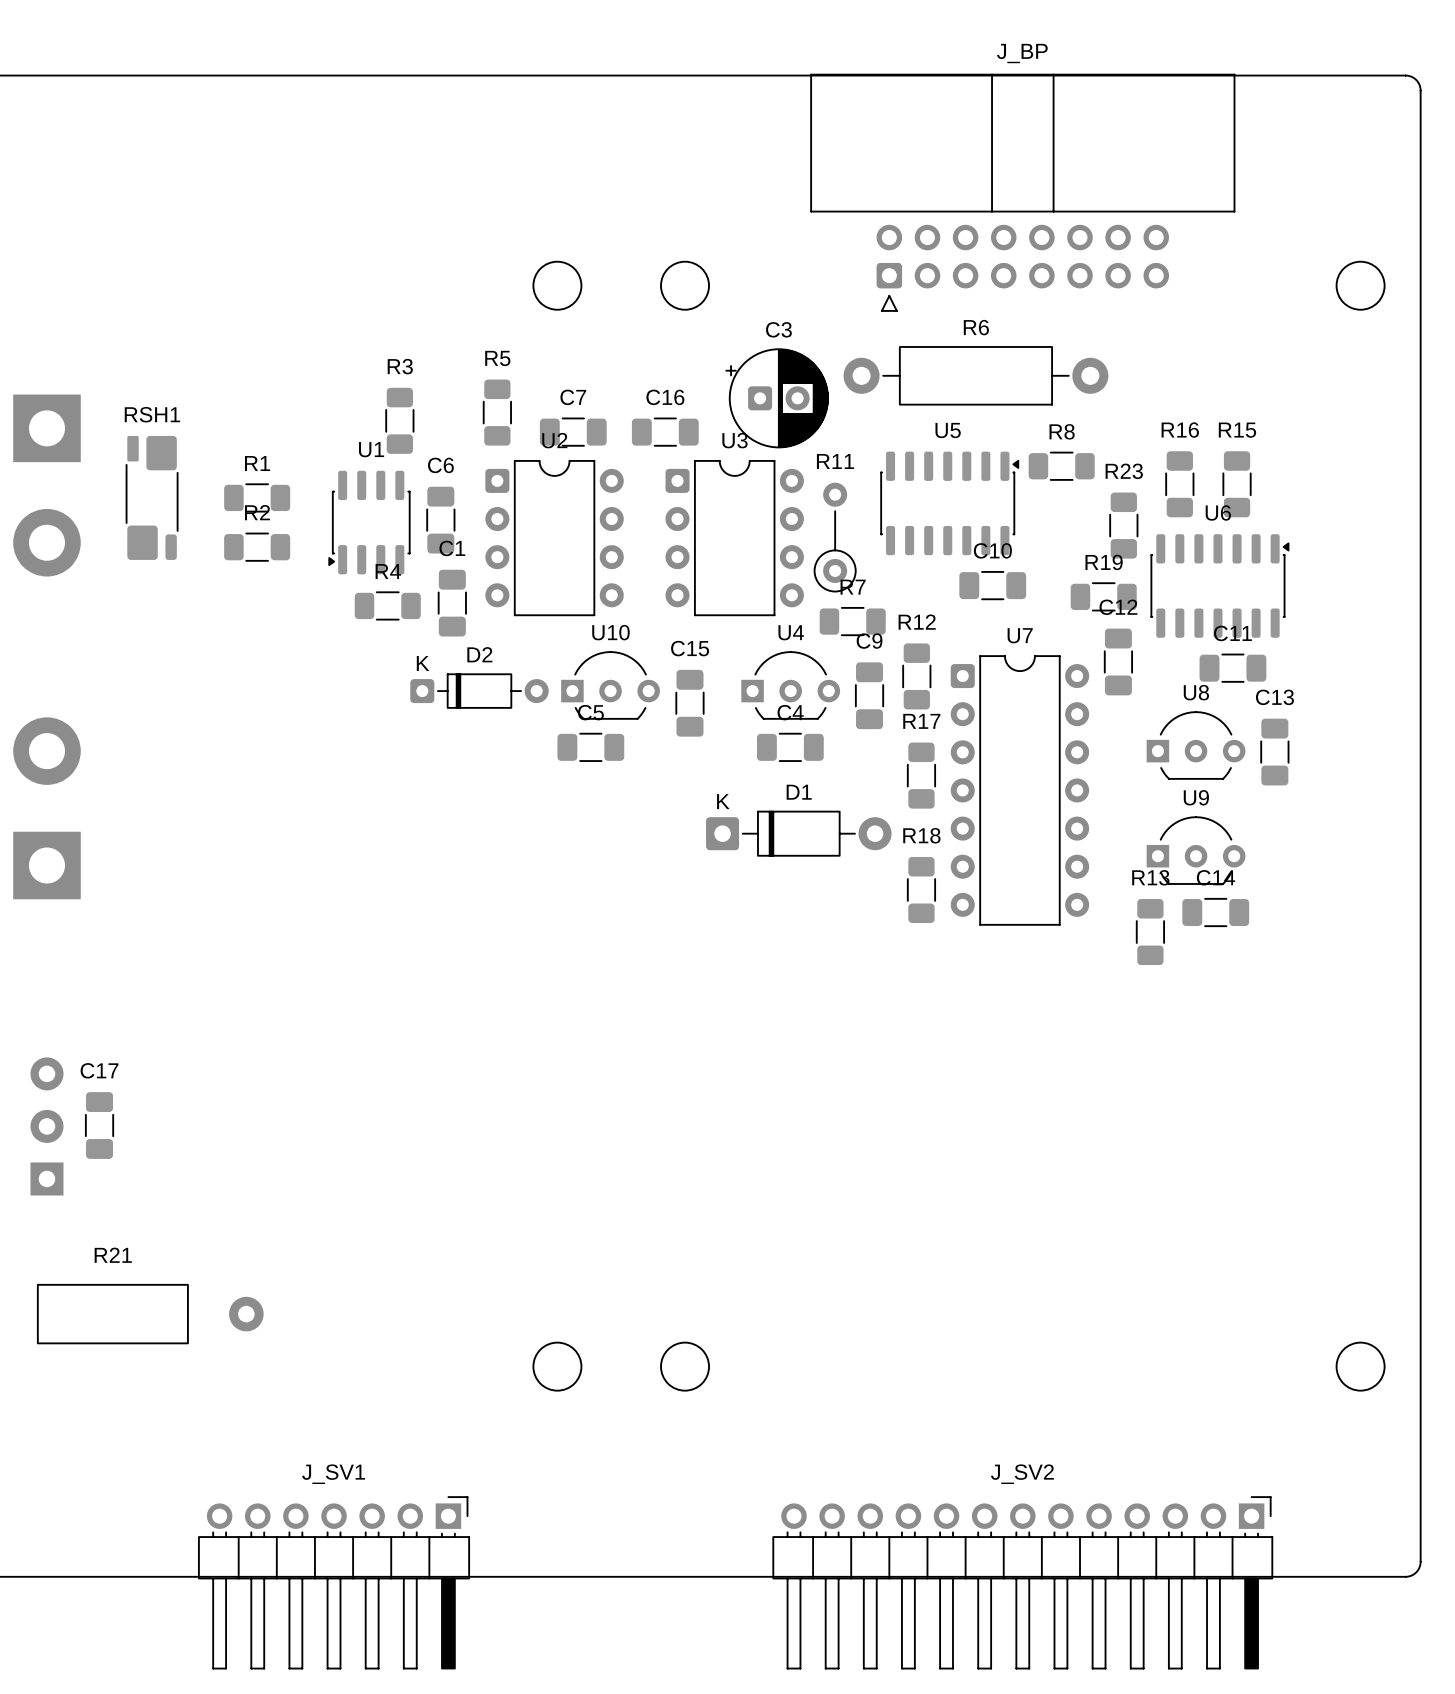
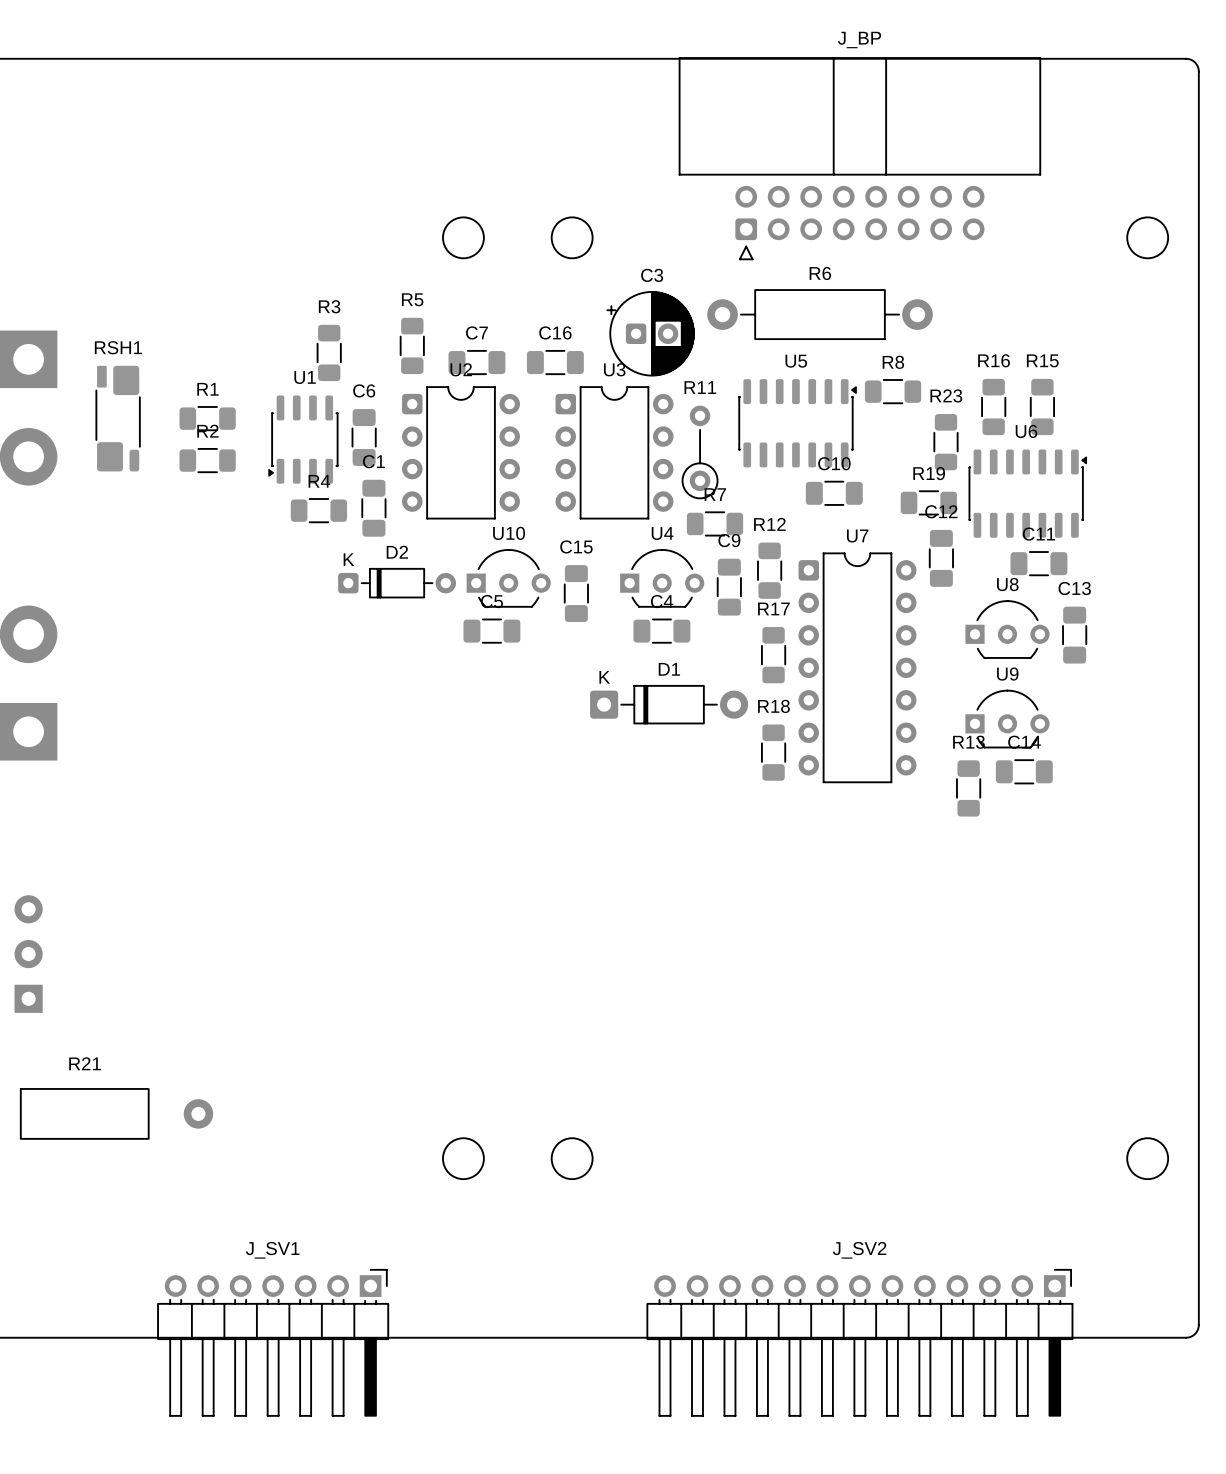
C17: (99, 1125) -> none

